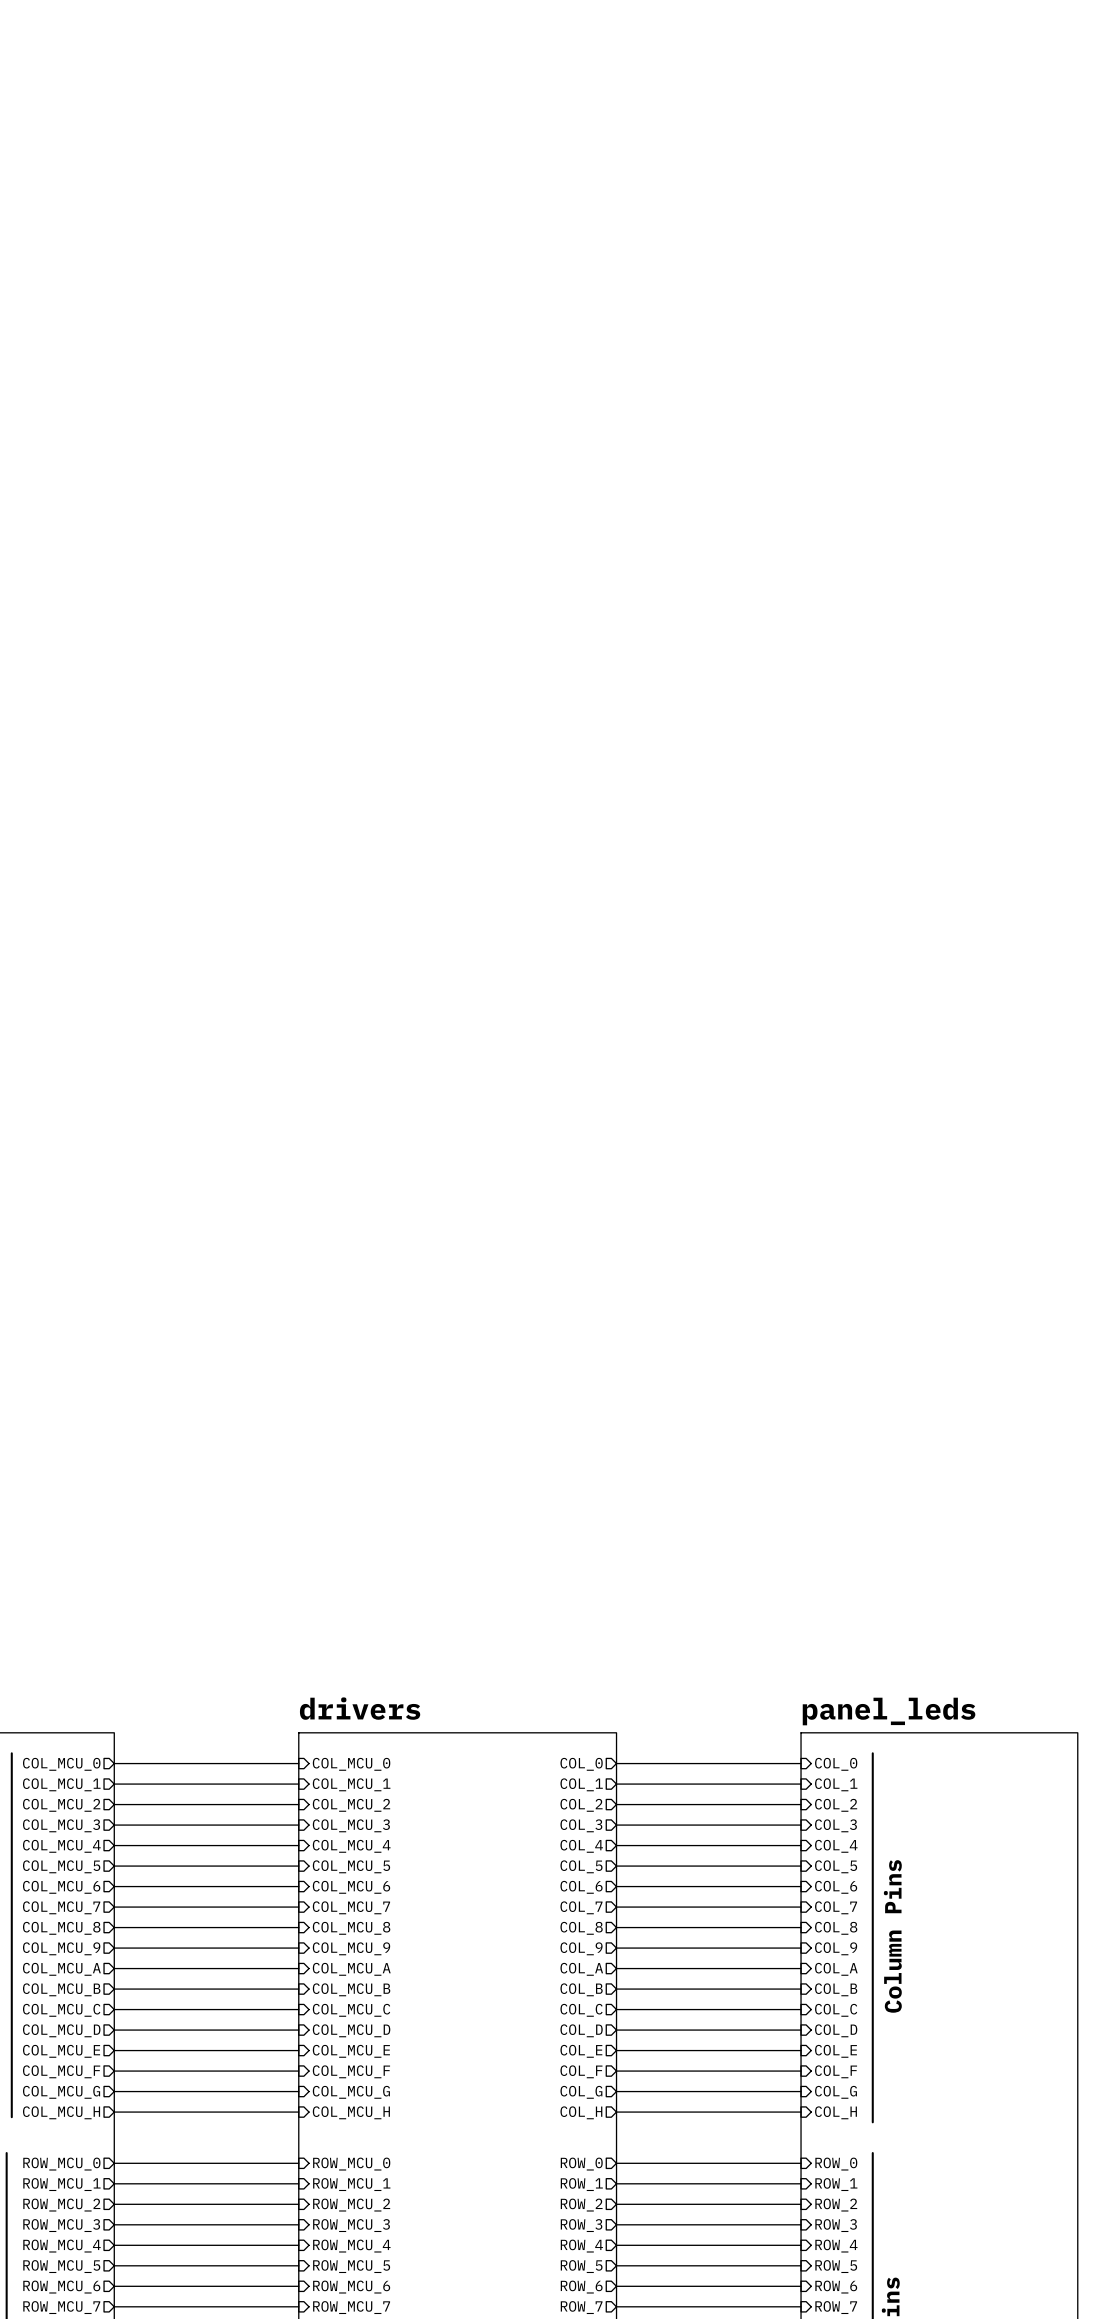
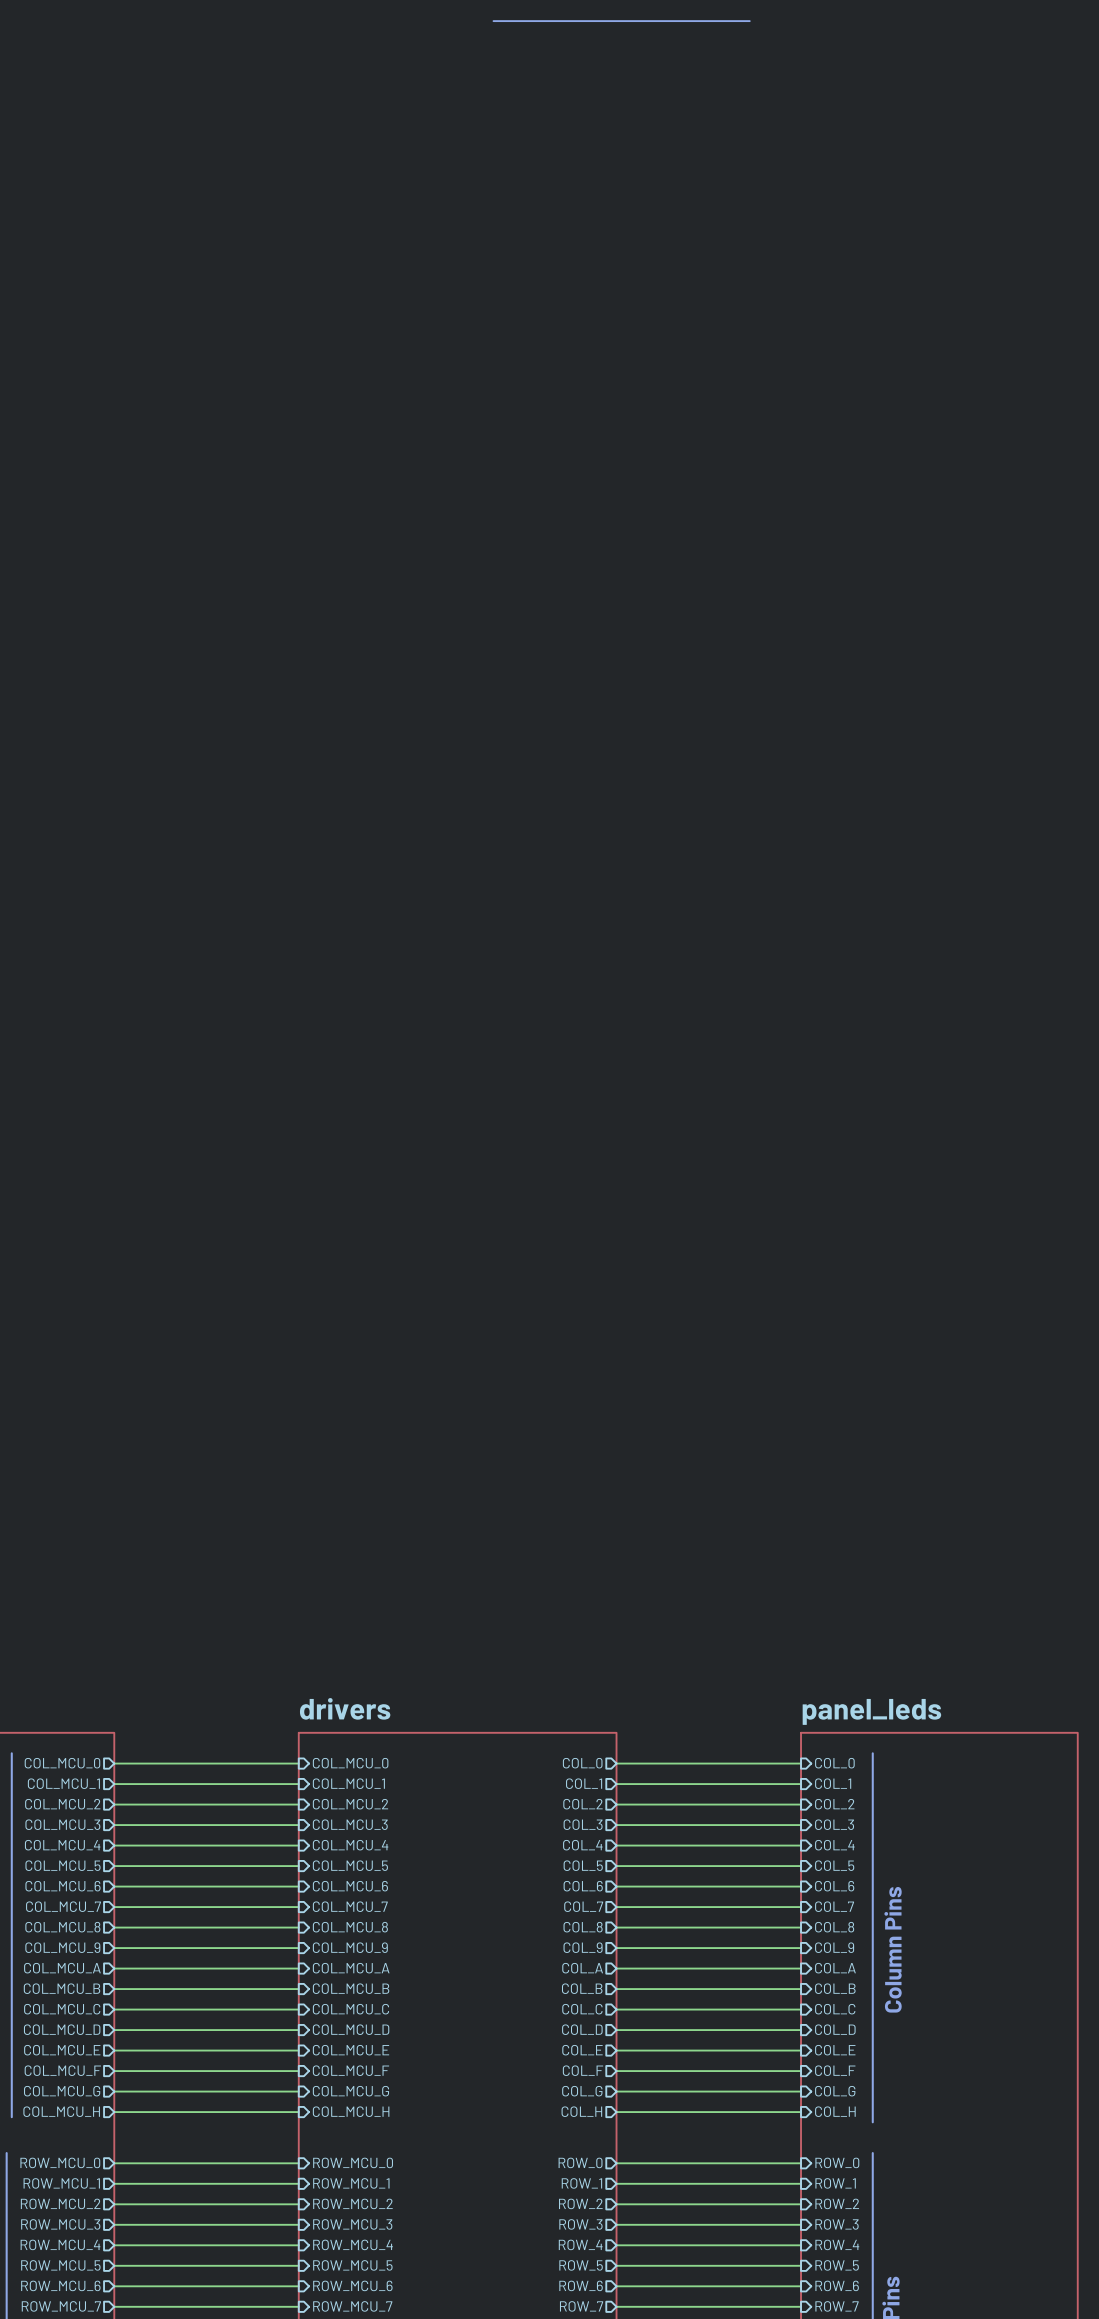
line: none -> (493, 21) (749, 21)

